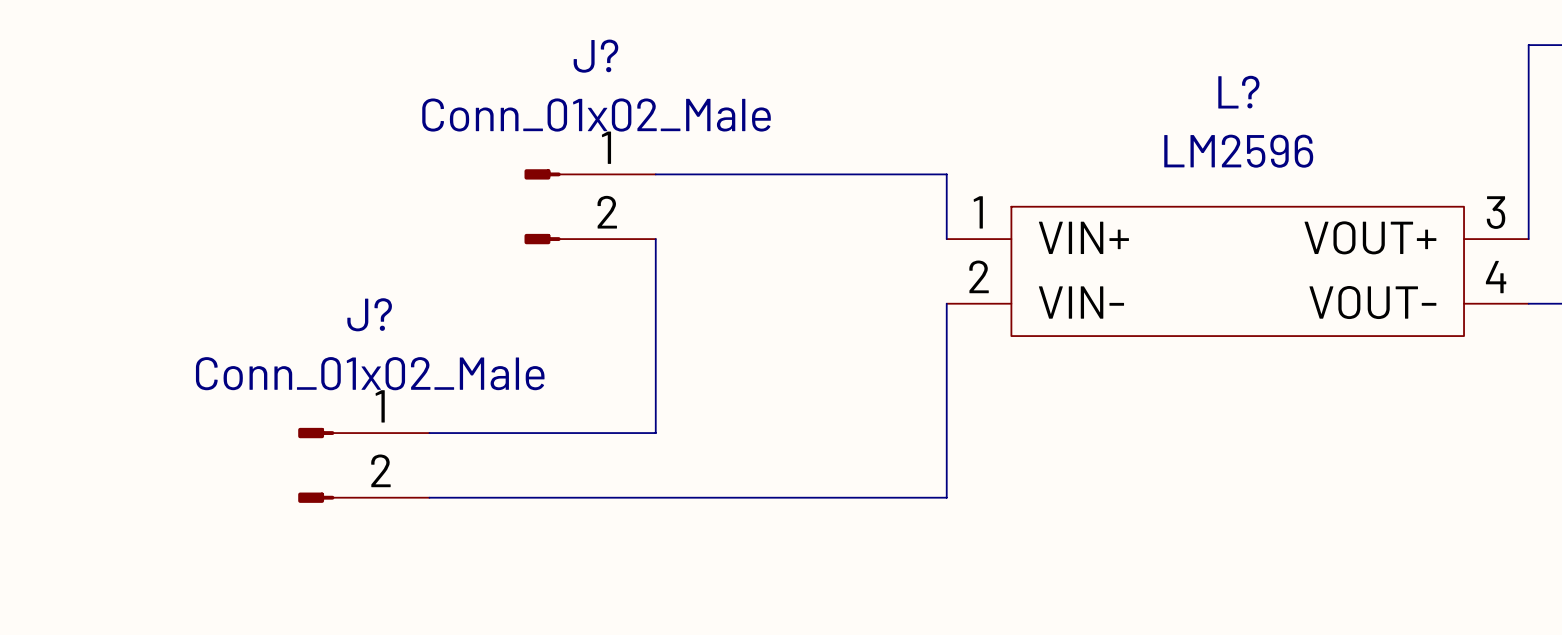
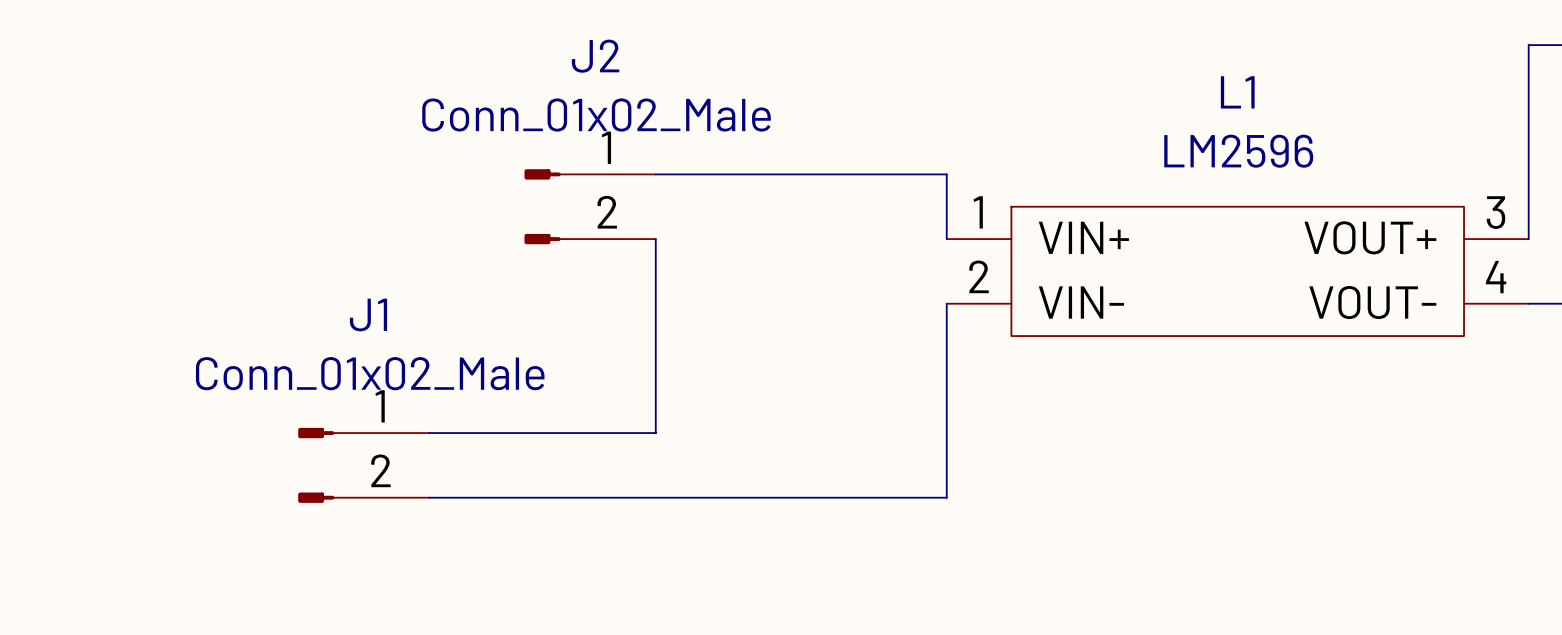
J? name: J? (595, 56) -> J2 (595, 56)
L? name: L? (1238, 92) -> L1 (1237, 92)
J? name: J? (369, 314) -> J1 (368, 314)

